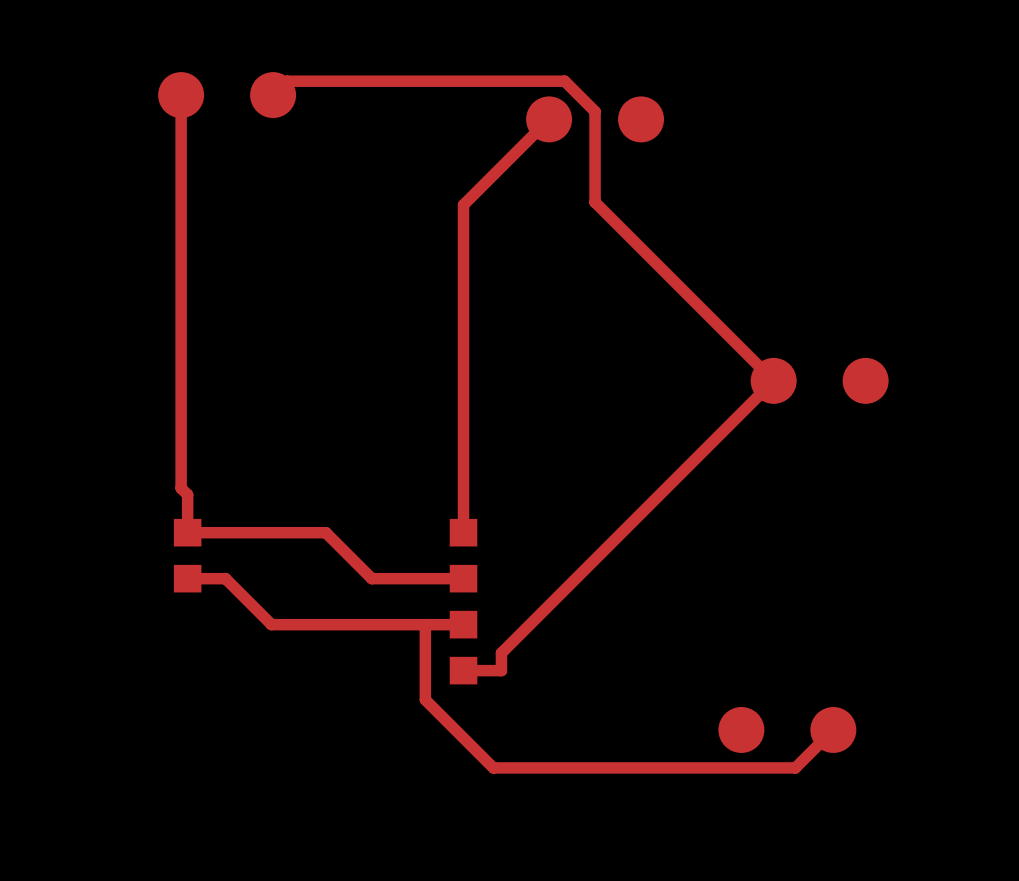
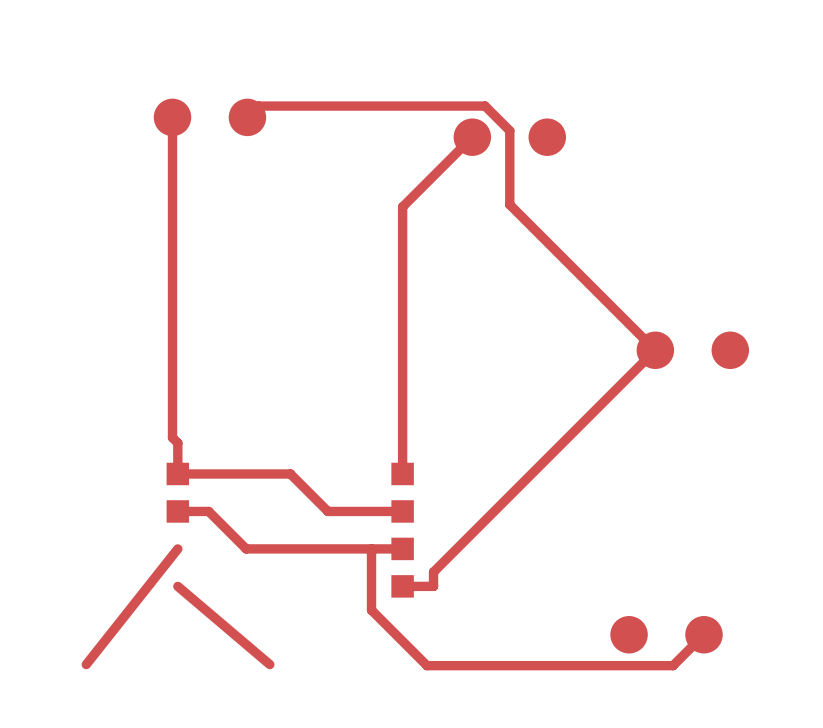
track: none -> (177, 548) (86, 664)
track: none -> (177, 586) (269, 664)

